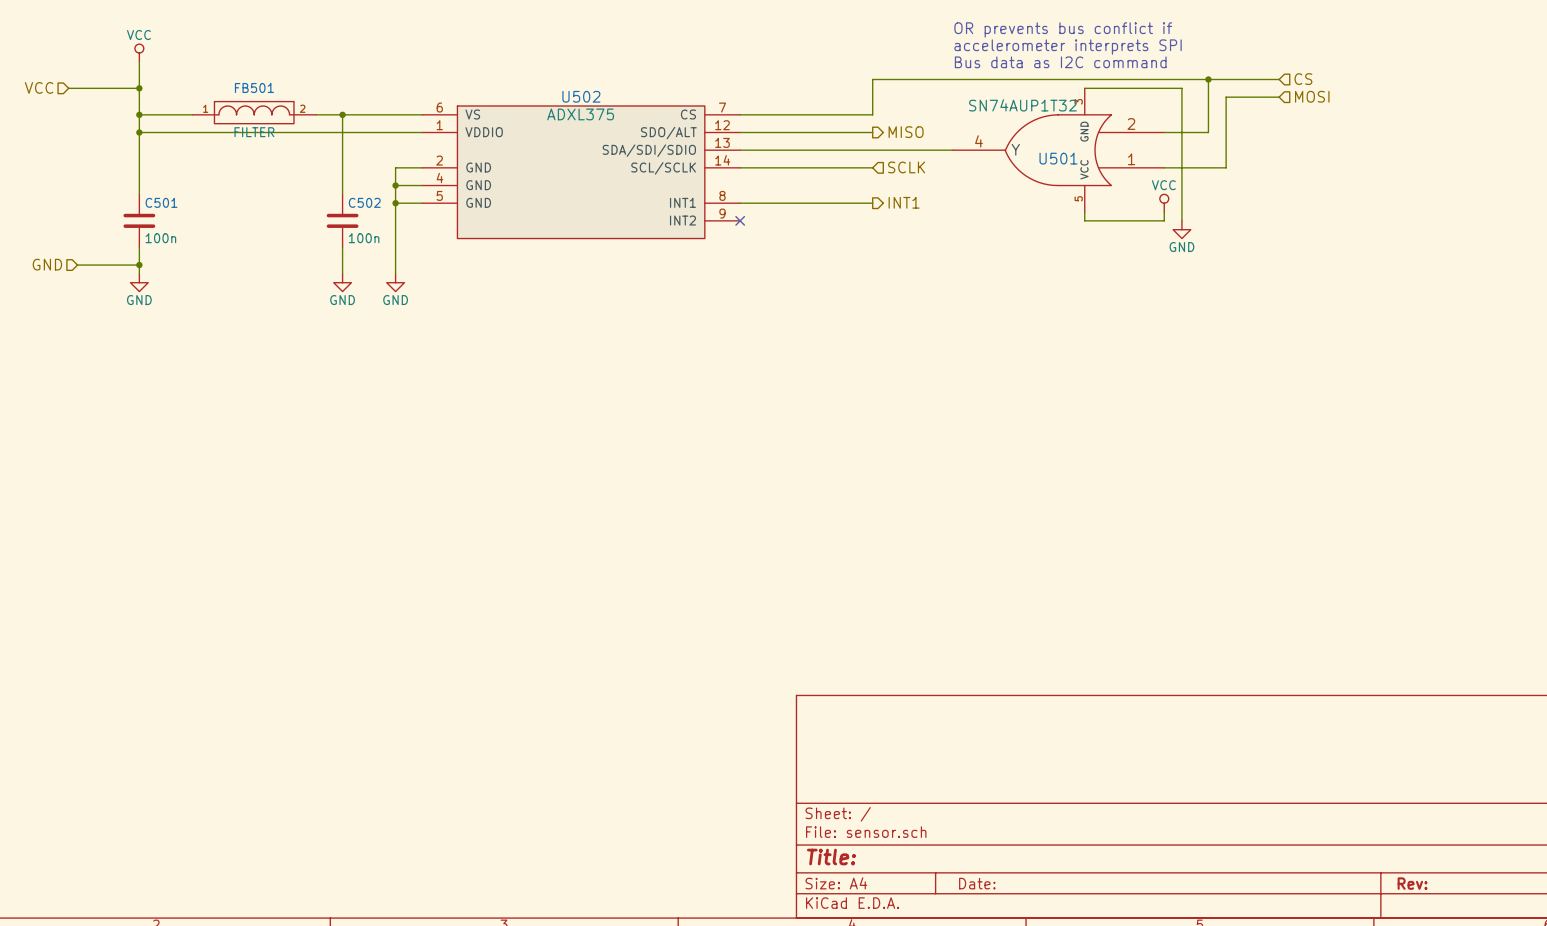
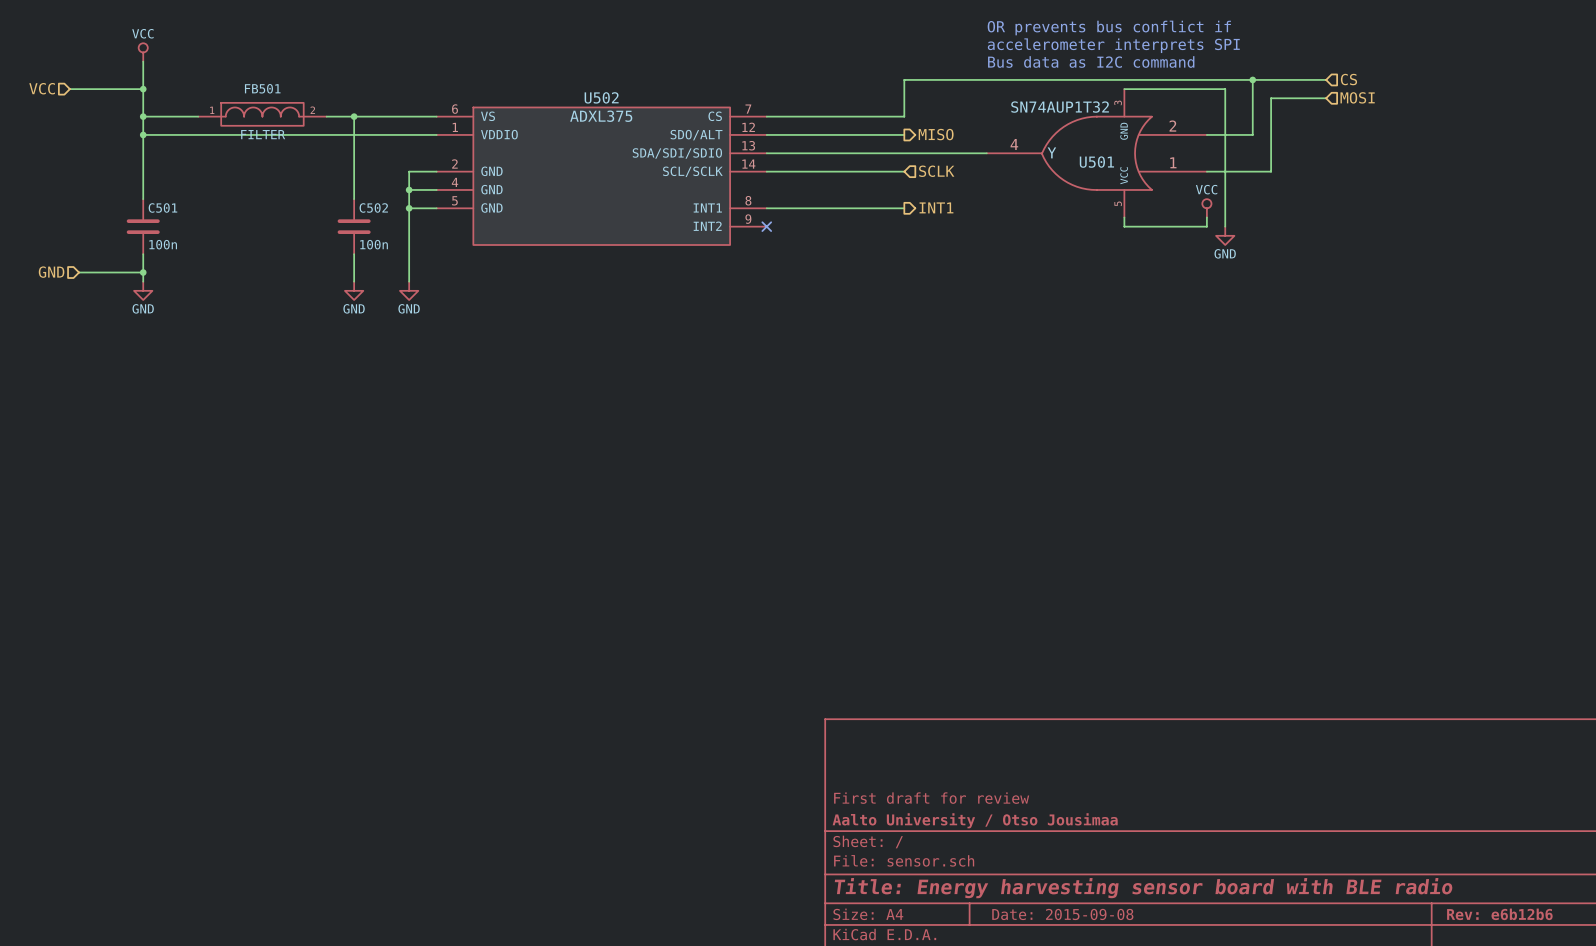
title block: none -> First draft for review (931, 798)
title block: none -> Aalto University / Otso Jousimaa (975, 820)
title block: Title: (831, 857) -> Title: Energy harvesting sensor board with BLE radio (1143, 888)
title block: Date: (977, 883) -> Date: 2015-09-08 (1062, 914)
title block: Rev: (1412, 883) -> Rev: e6b12b6 (1499, 914)

